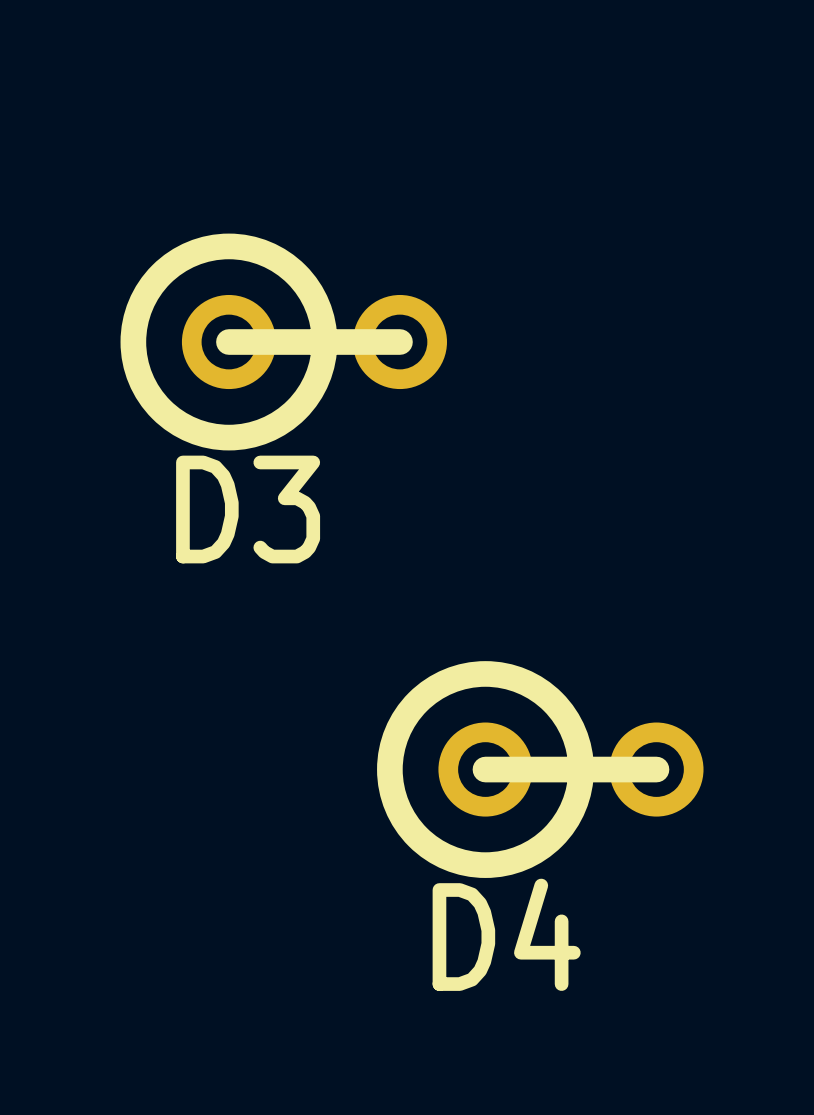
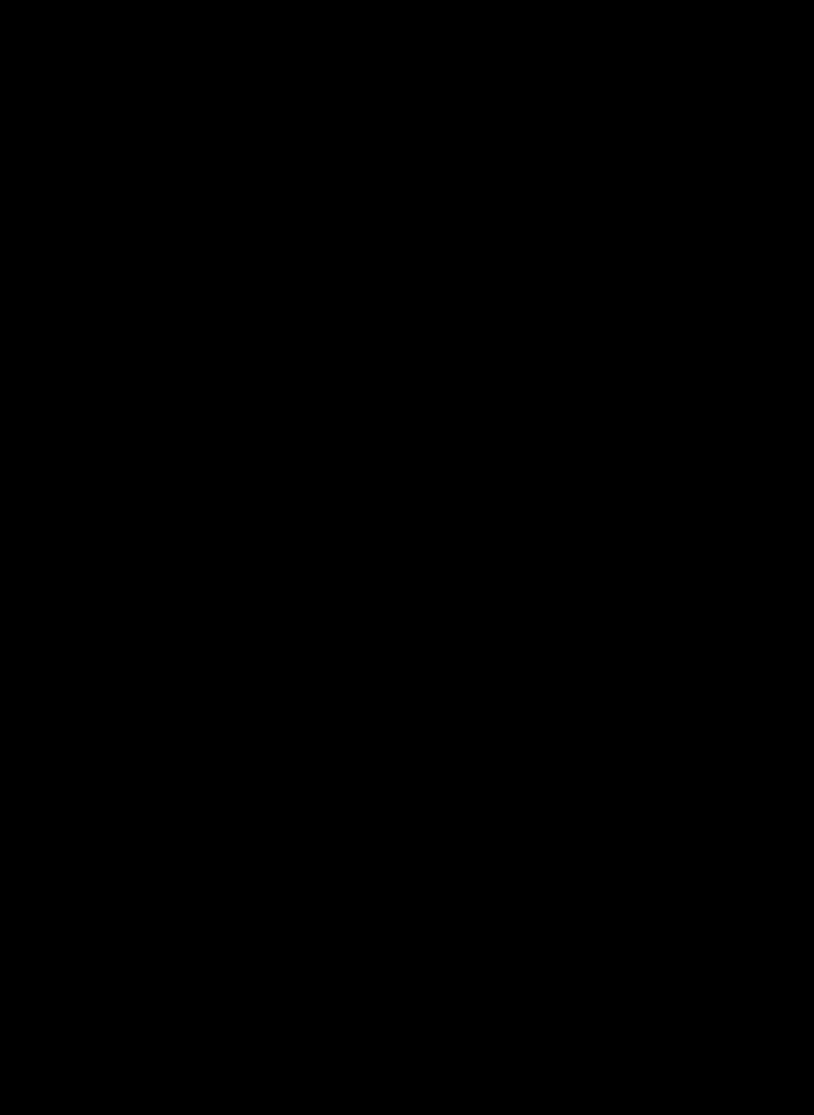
D3: (283, 342) -> none
D4: (540, 769) -> none

